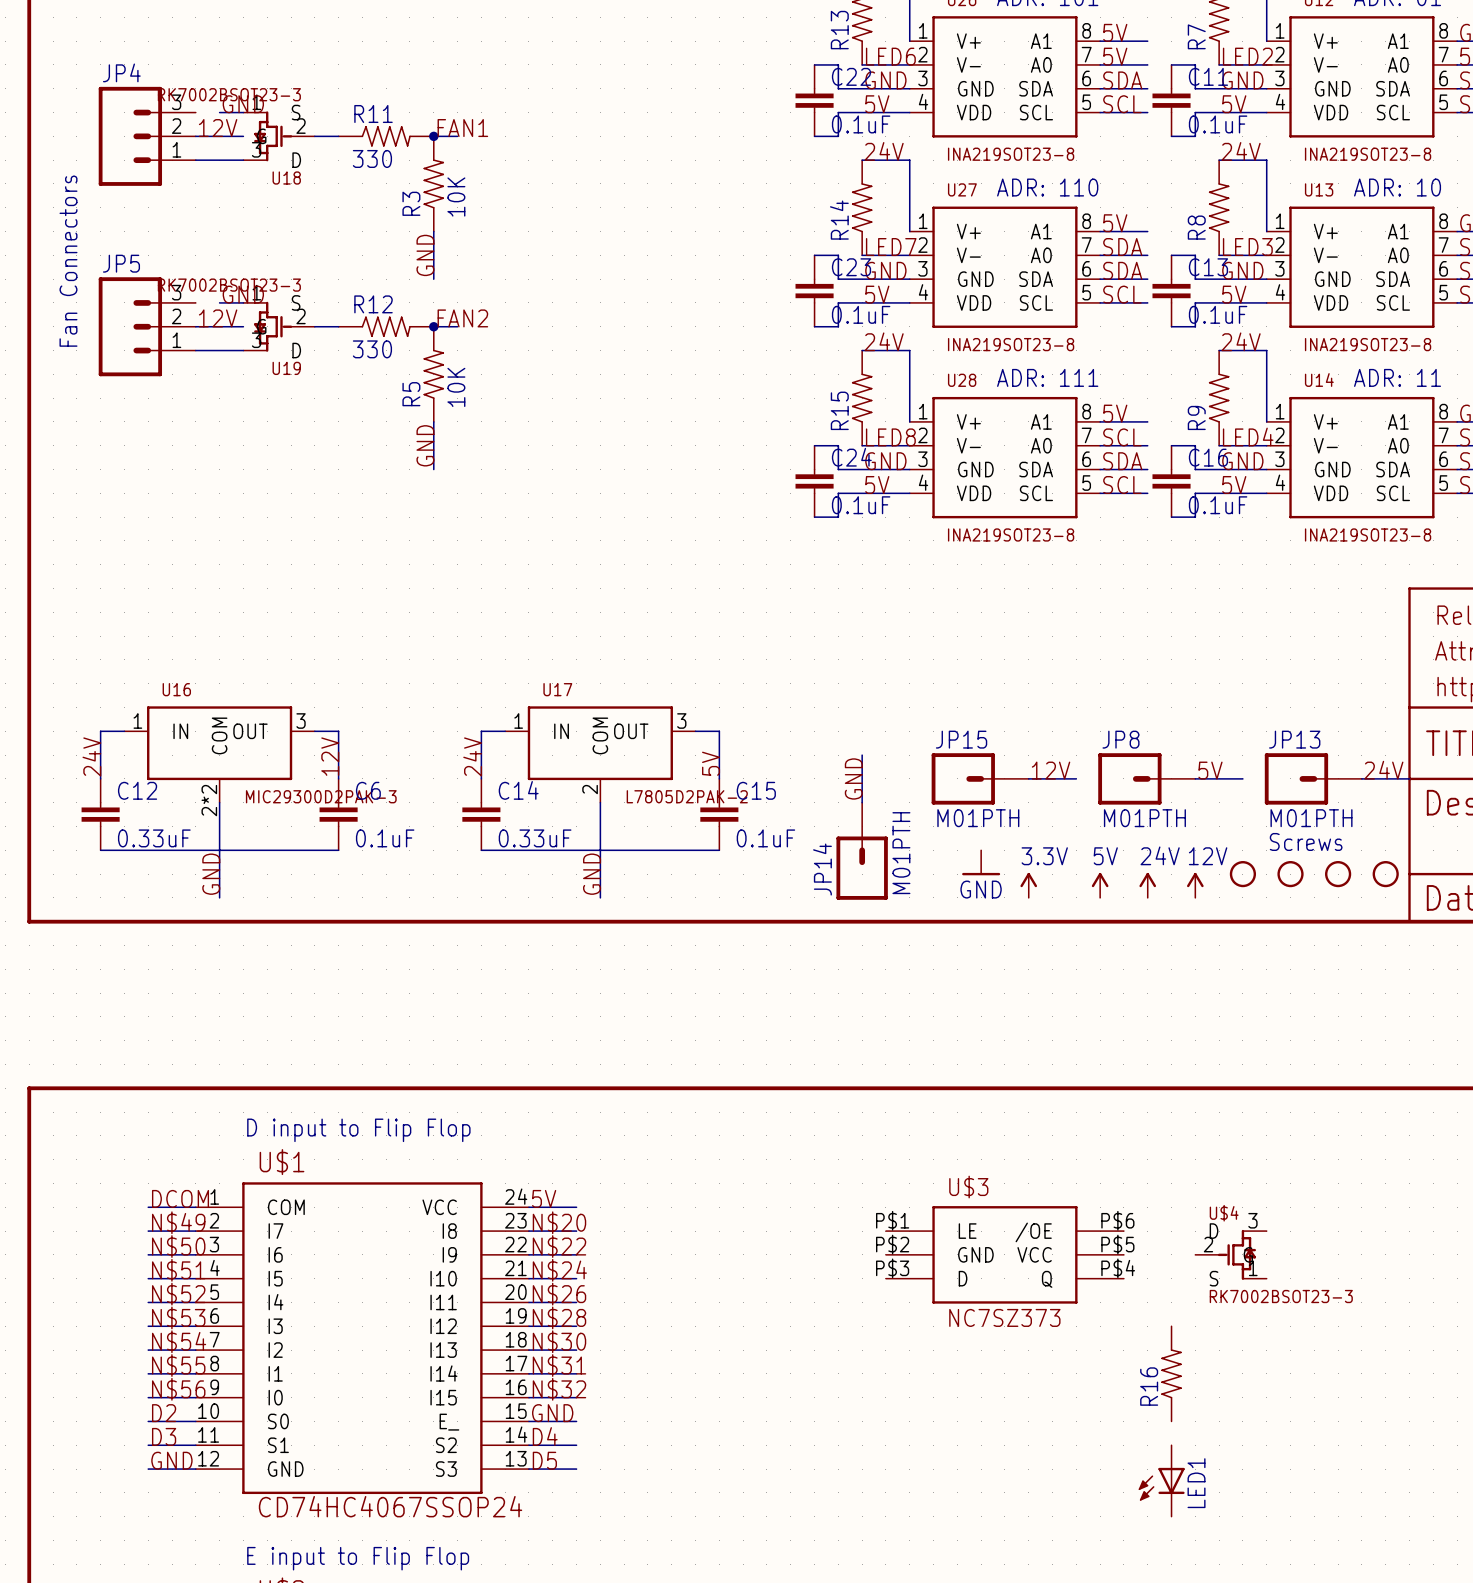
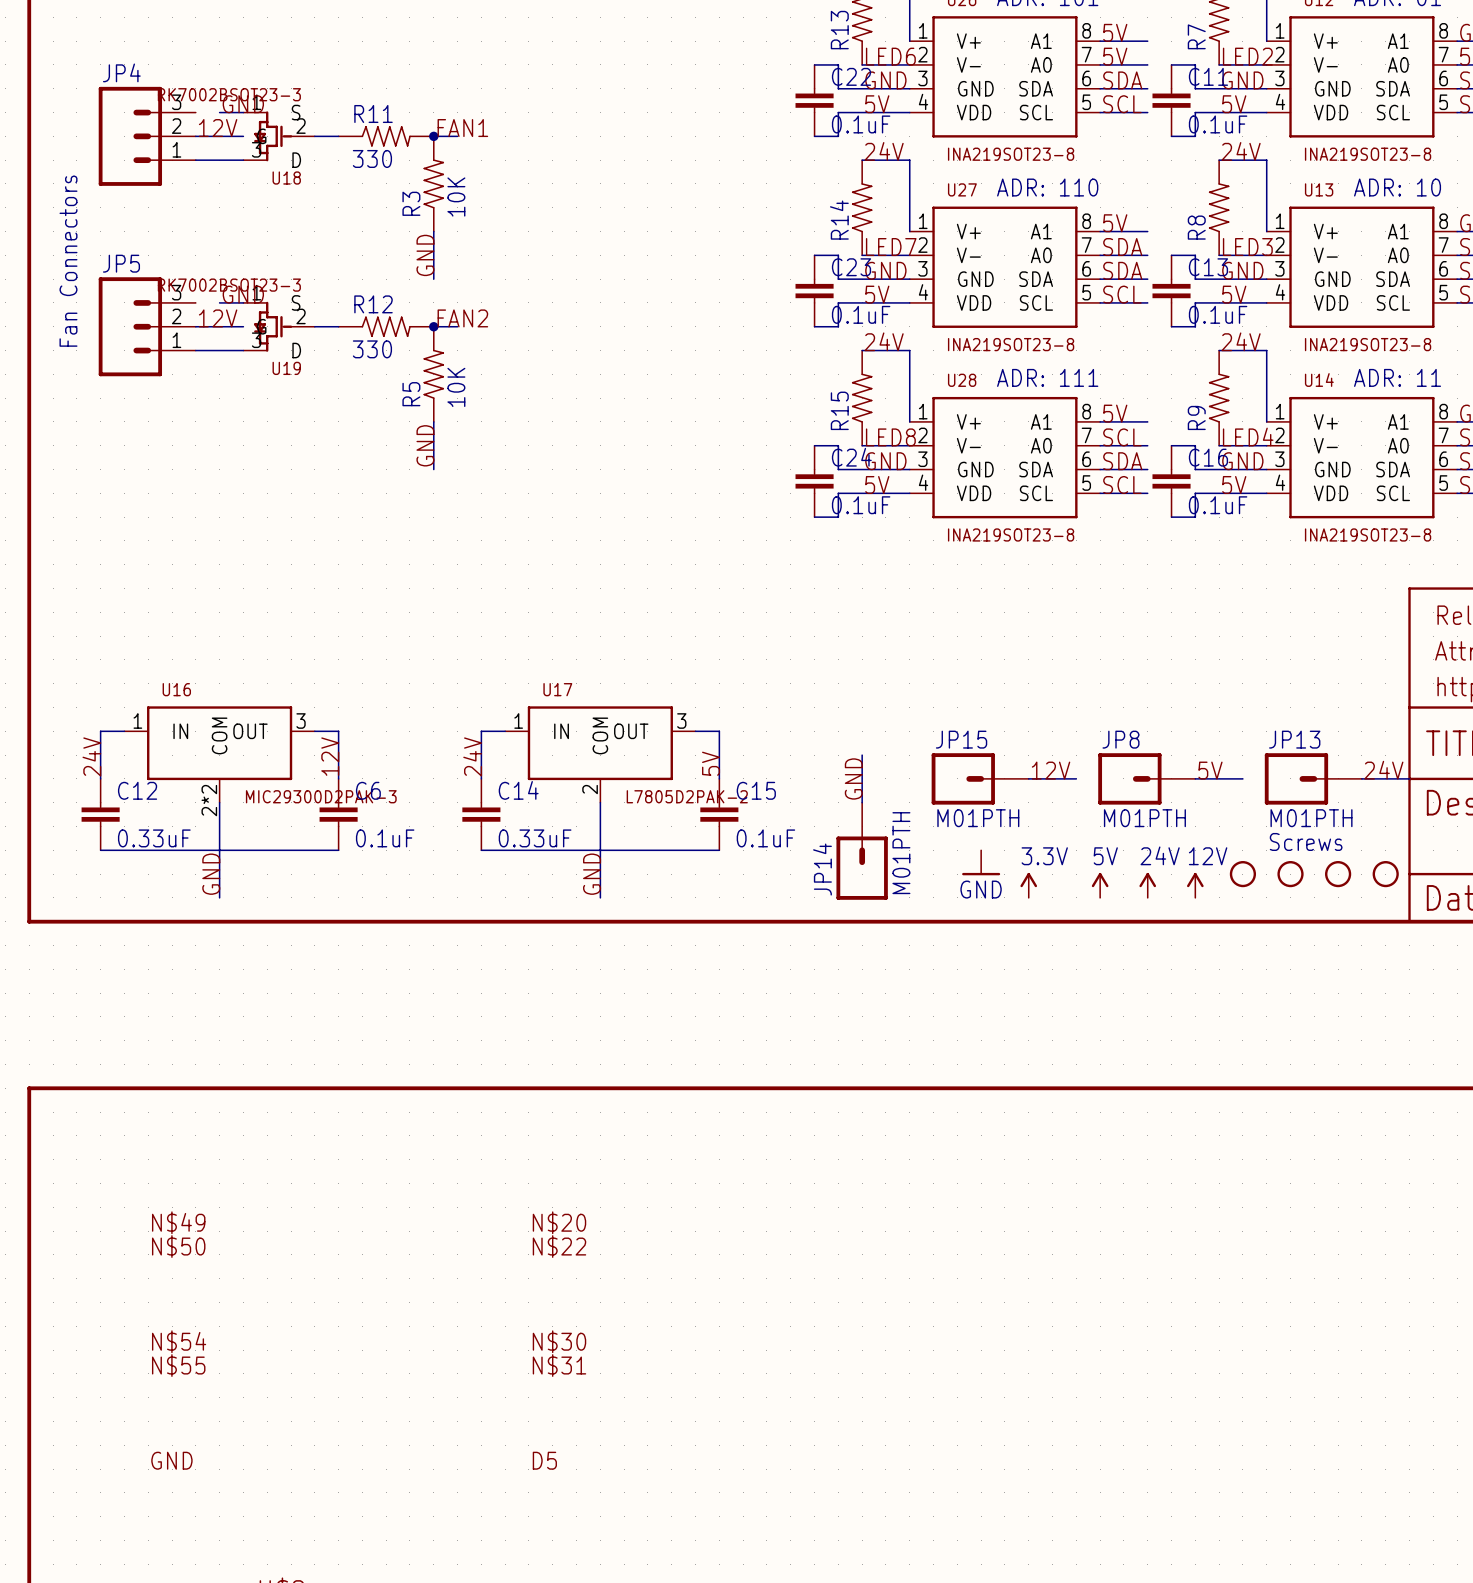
text: D input to Flip Flop (358, 1130) -> none
label: DCOM (180, 1198) -> none
label: 5V (544, 1198) -> none
wire: (148, 1207) (195, 1207) -> none
wire: (528, 1207) (576, 1207) -> none
wire: (148, 1231) (195, 1231) -> none
wire: (528, 1231) (576, 1231) -> none
wire: (148, 1254) (195, 1254) -> none
wire: (528, 1254) (576, 1254) -> none
U$3: NC7SZ373 (1004, 1254) -> none
U$4: RK7002BSOT23-3 (1231, 1254) -> none
label: N$51 (178, 1270) -> none
label: N$24 (559, 1270) -> none
wire: (148, 1278) (195, 1278) -> none
wire: (528, 1278) (576, 1278) -> none
label: N$52 (178, 1294) -> none
label: N$26 (559, 1294) -> none
wire: (148, 1302) (195, 1302) -> none
wire: (528, 1302) (576, 1302) -> none
label: N$53 (178, 1317) -> none
label: N$28 (559, 1317) -> none
wire: (148, 1326) (195, 1326) -> none
wire: (528, 1326) (576, 1326) -> none
U$1: CD74HC4067SSOP24 (362, 1338) -> none
wire: (148, 1350) (195, 1350) -> none
wire: (528, 1350) (576, 1350) -> none
wire: (148, 1373) (195, 1373) -> none
wire: (528, 1373) (576, 1373) -> none
R16: (1171, 1373) -> none
label: N$56 (178, 1389) -> none
label: N$32 (559, 1389) -> none
wire: (148, 1397) (195, 1397) -> none
wire: (528, 1397) (576, 1397) -> none
label: D2 (164, 1413) -> none
label: GND (552, 1413) -> none
wire: (148, 1421) (195, 1421) -> none
wire: (528, 1421) (576, 1421) -> none
label: D3 (164, 1436) -> none
label: D4 (545, 1436) -> none
wire: (148, 1445) (195, 1445) -> none
wire: (528, 1445) (576, 1445) -> none
wire: (148, 1469) (195, 1469) -> none
wire: (528, 1469) (576, 1469) -> none
LED1: (1161, 1480) -> none
text: E input to Flip Flop (358, 1558) -> none

